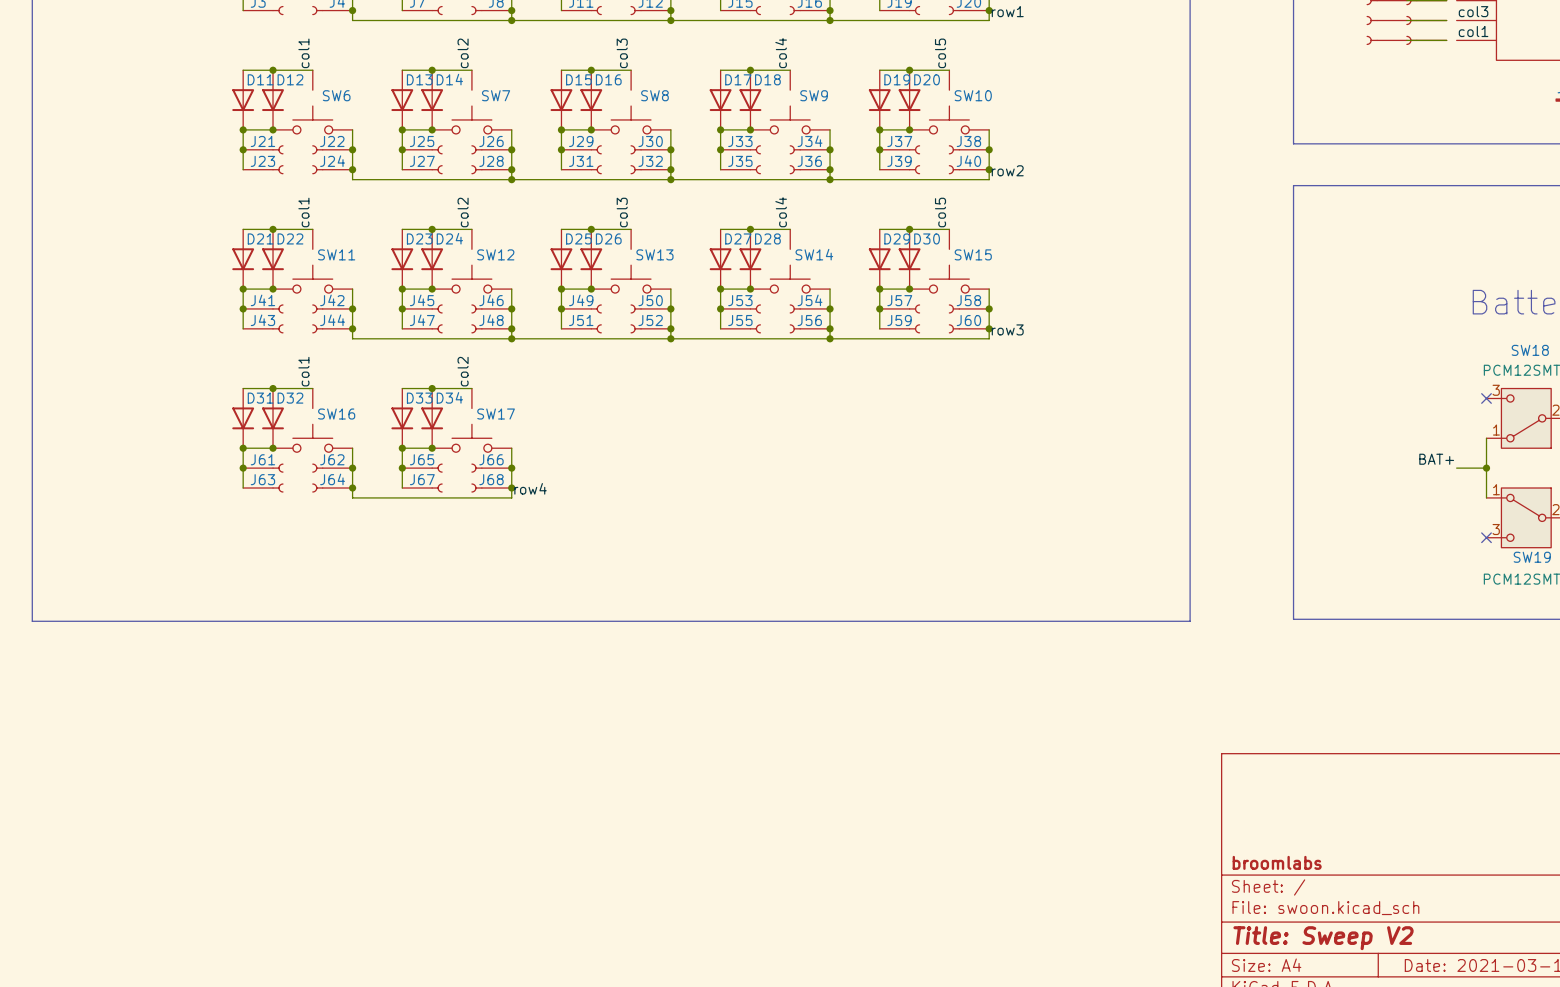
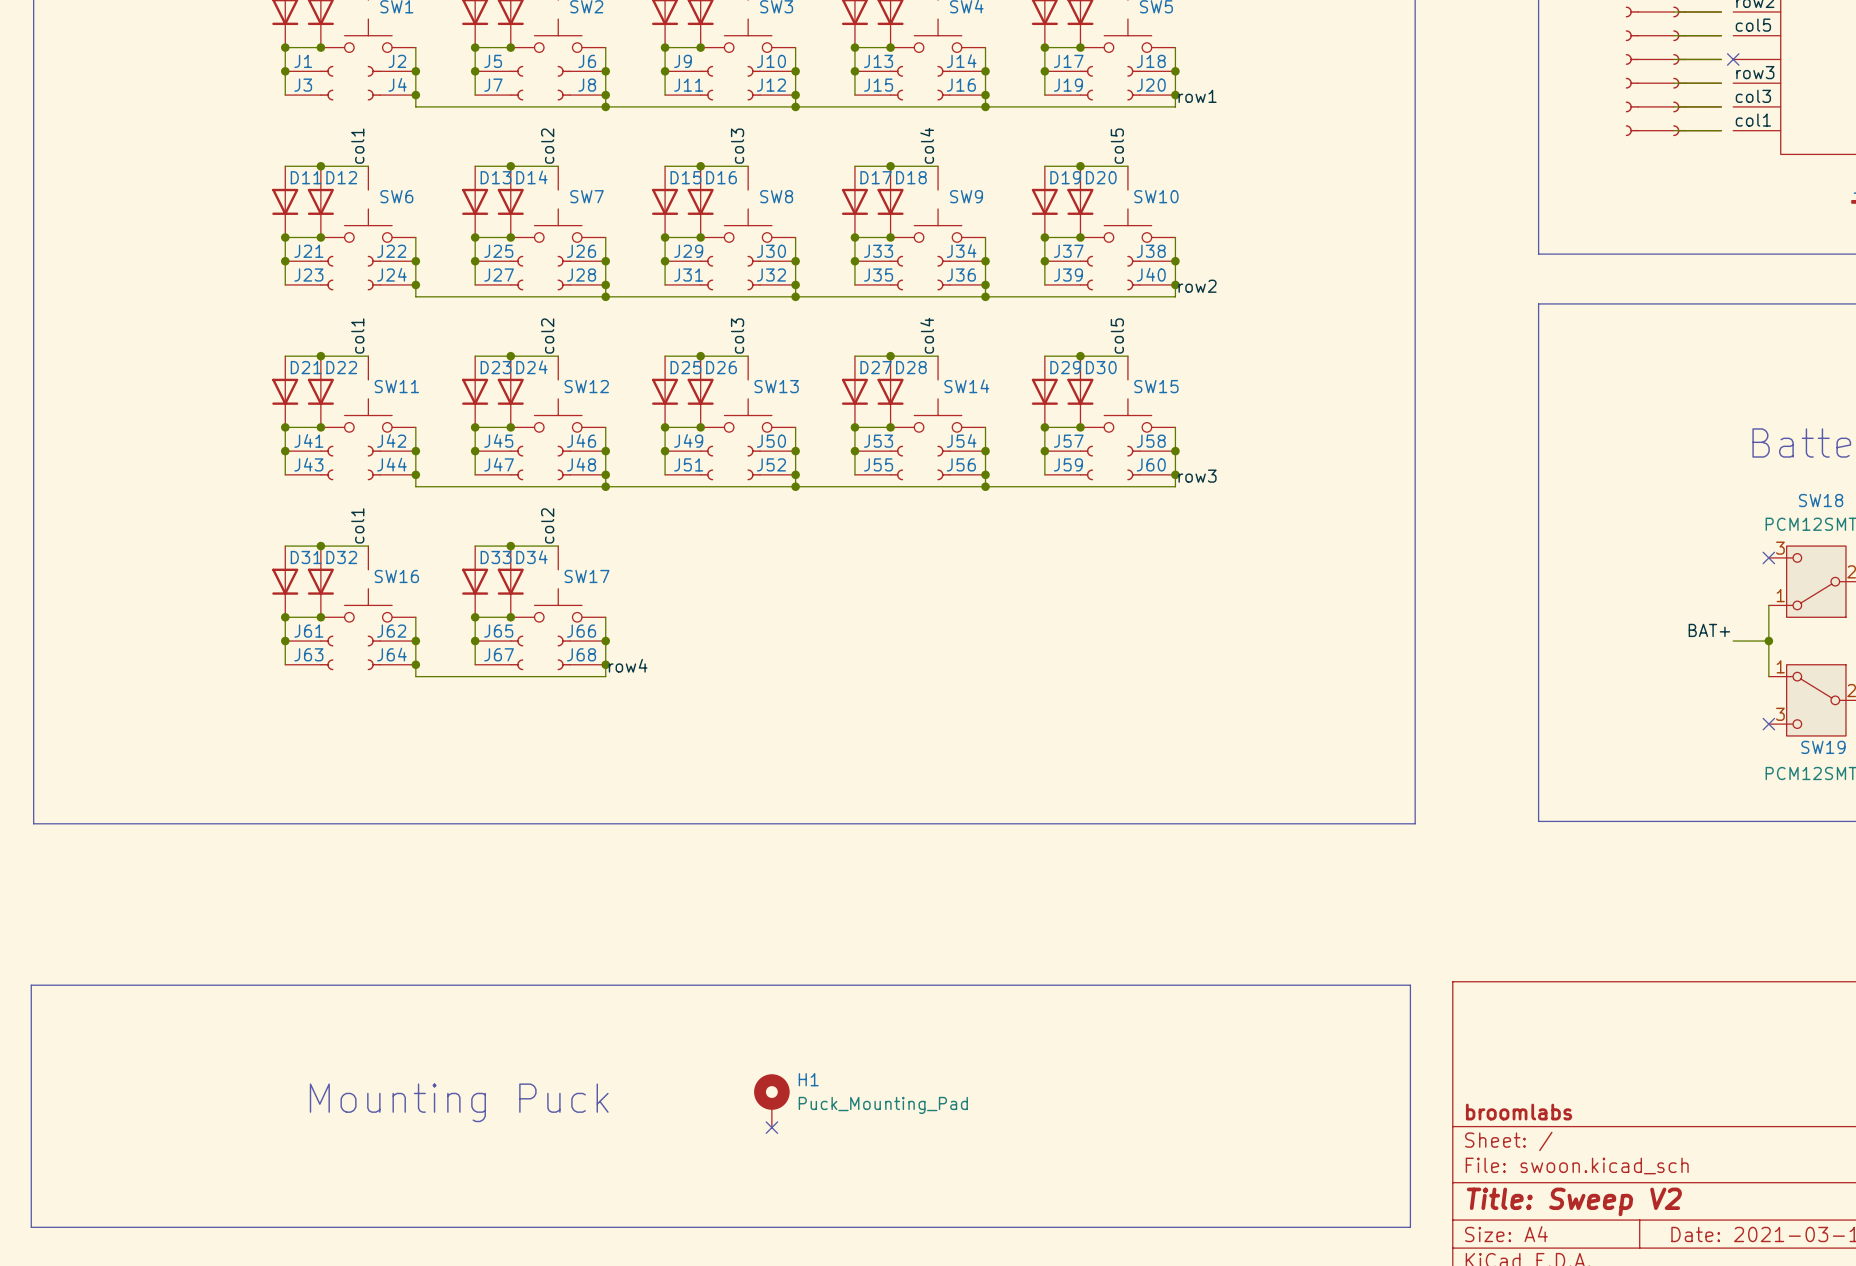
line: none -> (31, 985) (1410, 985) (1410, 1227) (31, 1227) (31, 985)
H1: none -> Puck_Mounting_Pad (771, 1100)
text: none -> Mounting Puck (459, 1102)
no-connect mark: none -> (771, 1127)

